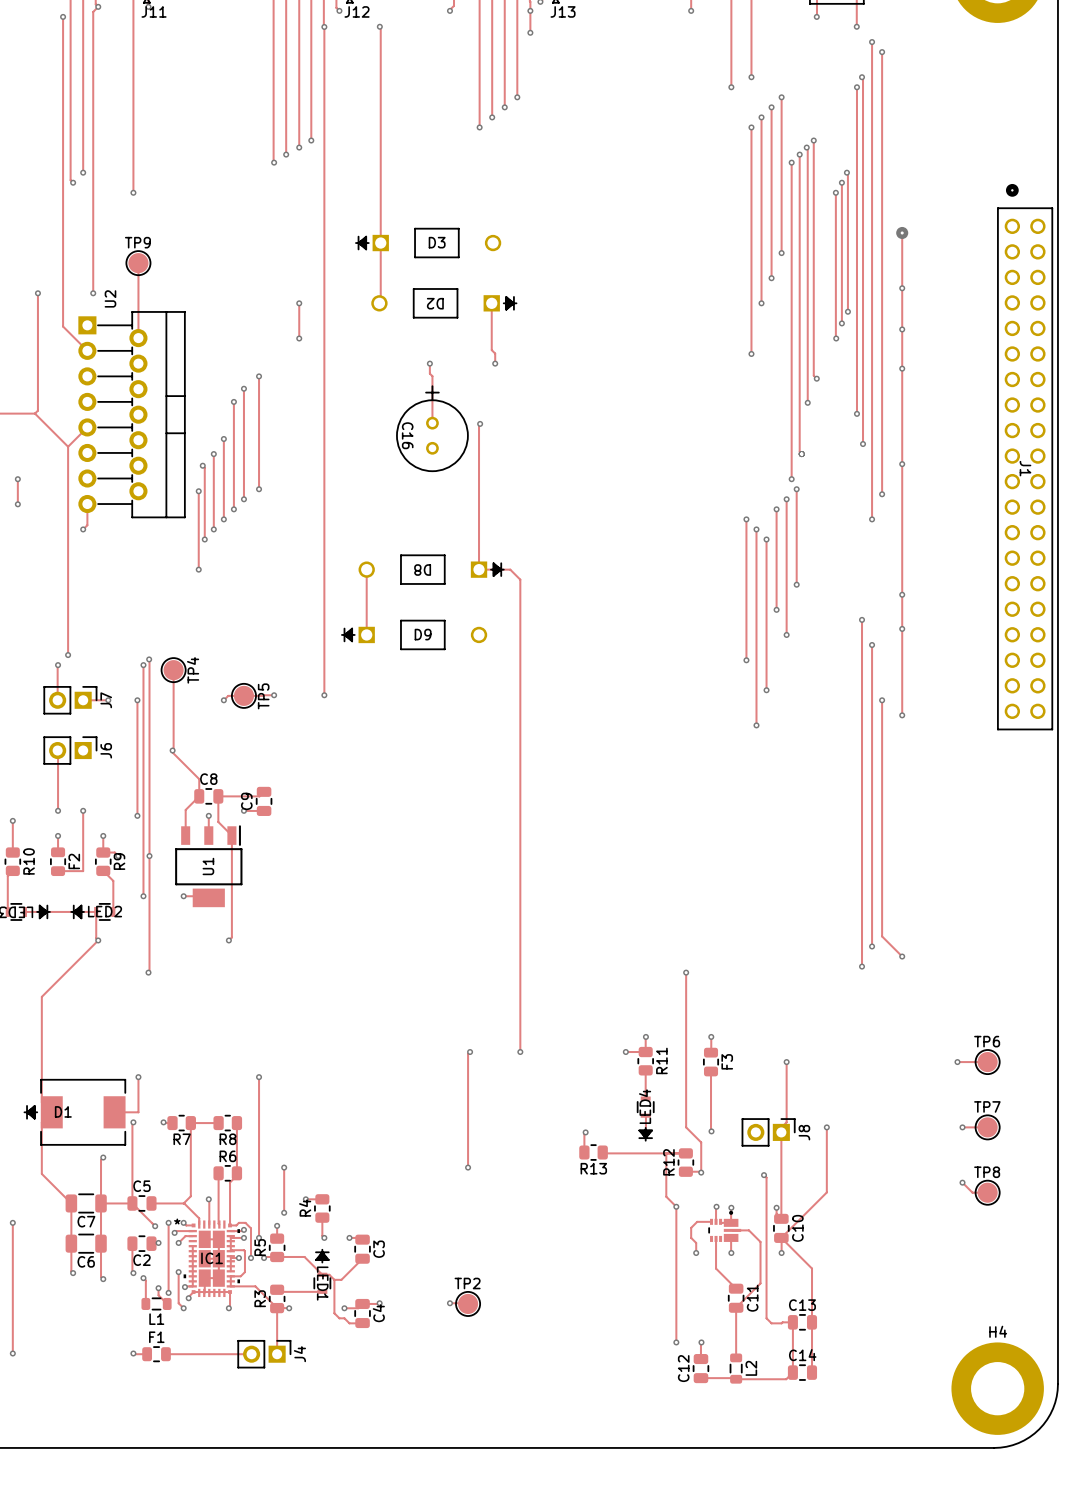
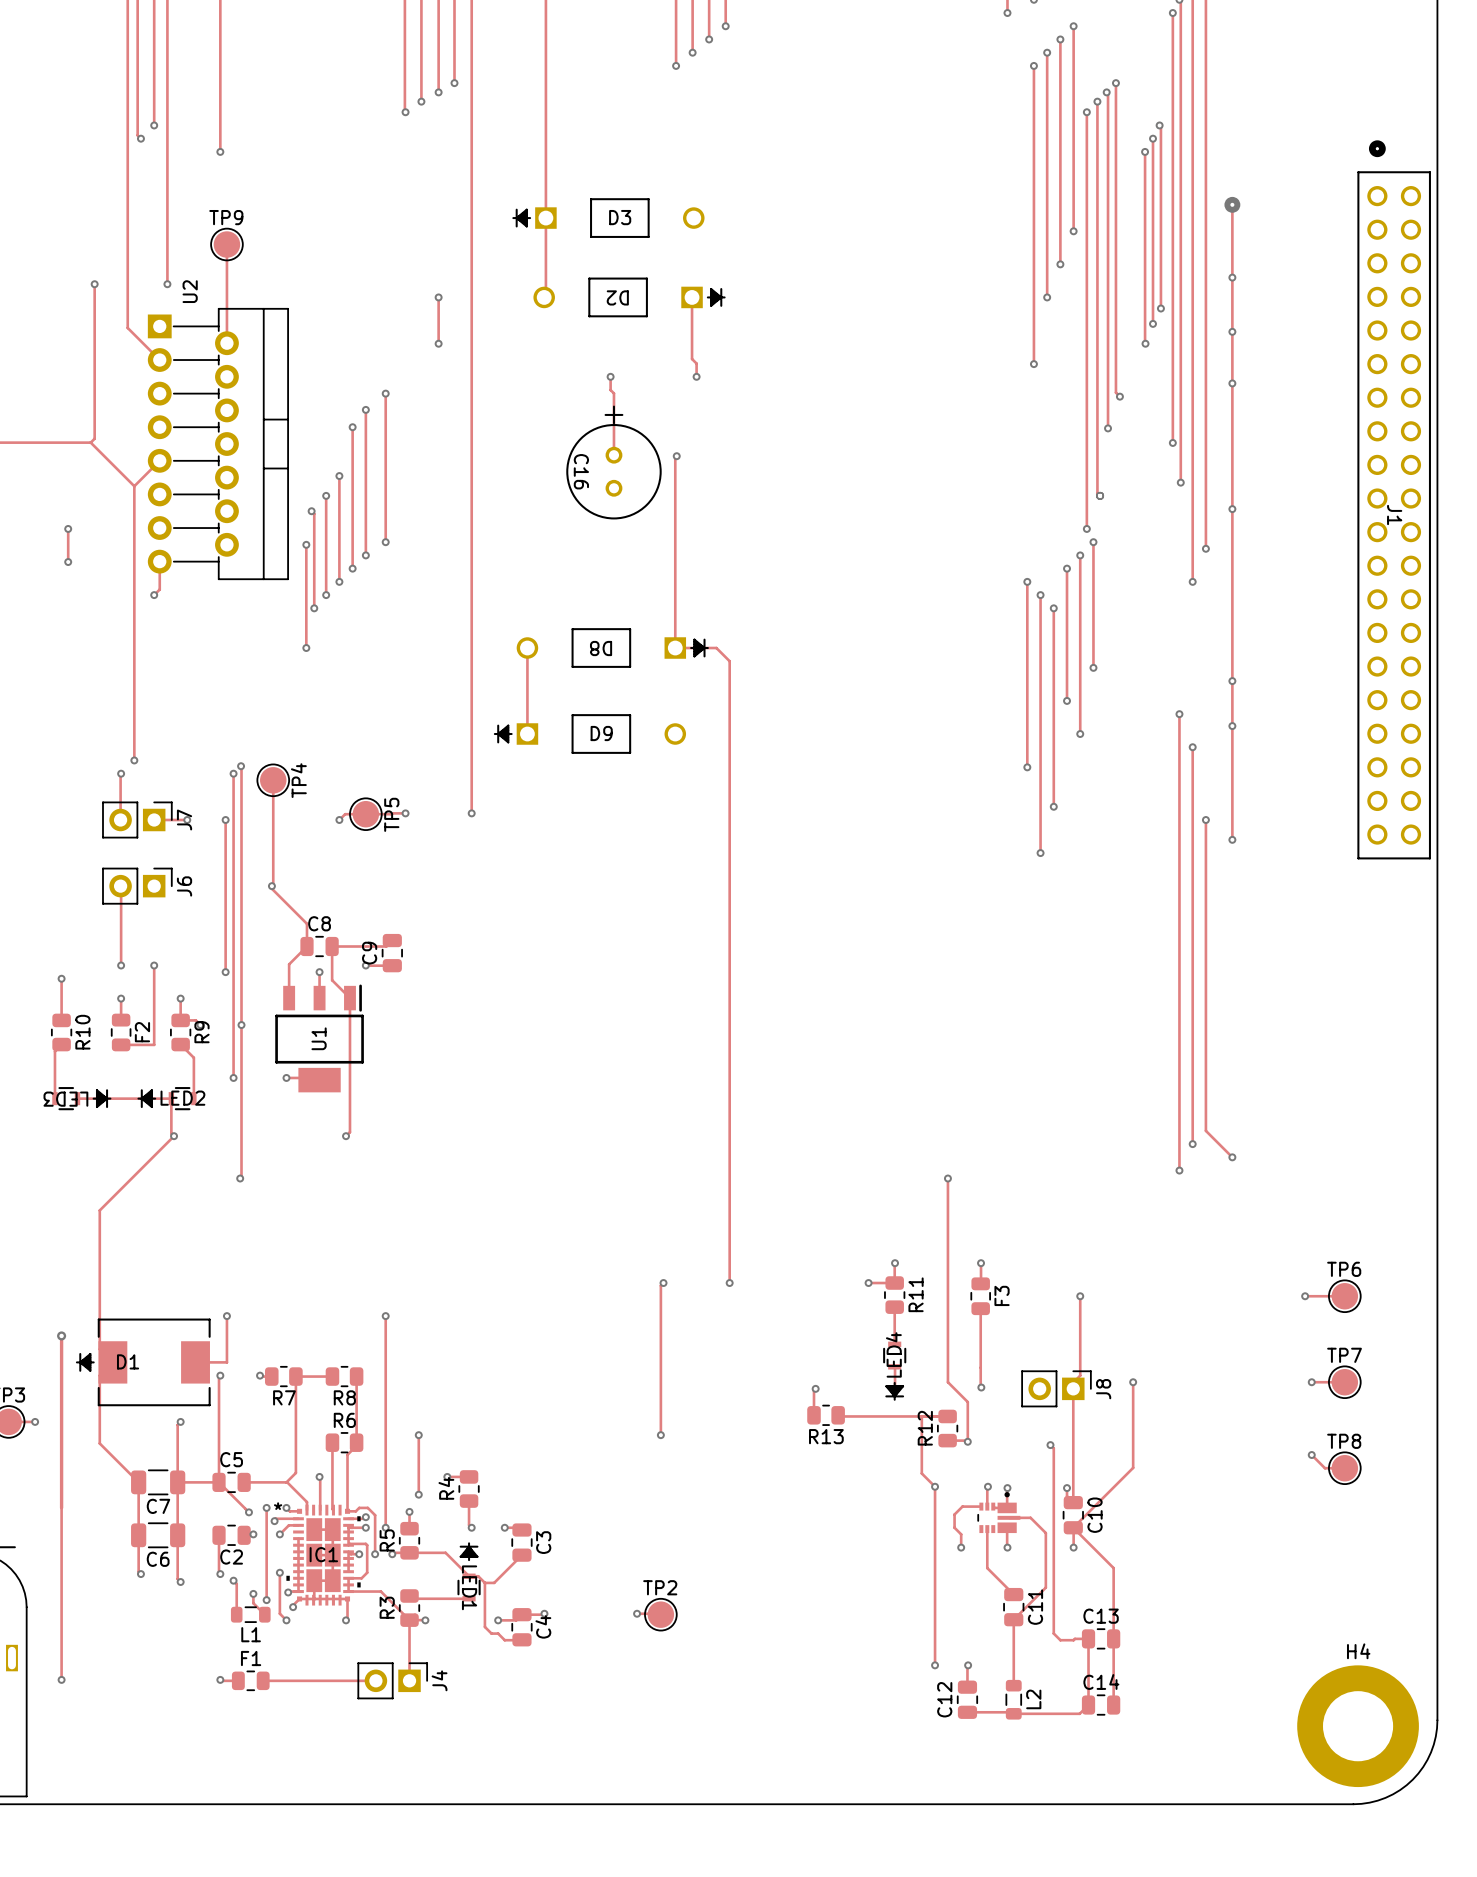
track: none -> (61, 1335) (61, 1507)
via: none -> (61, 1335)
via: (12, 1222) -> none

